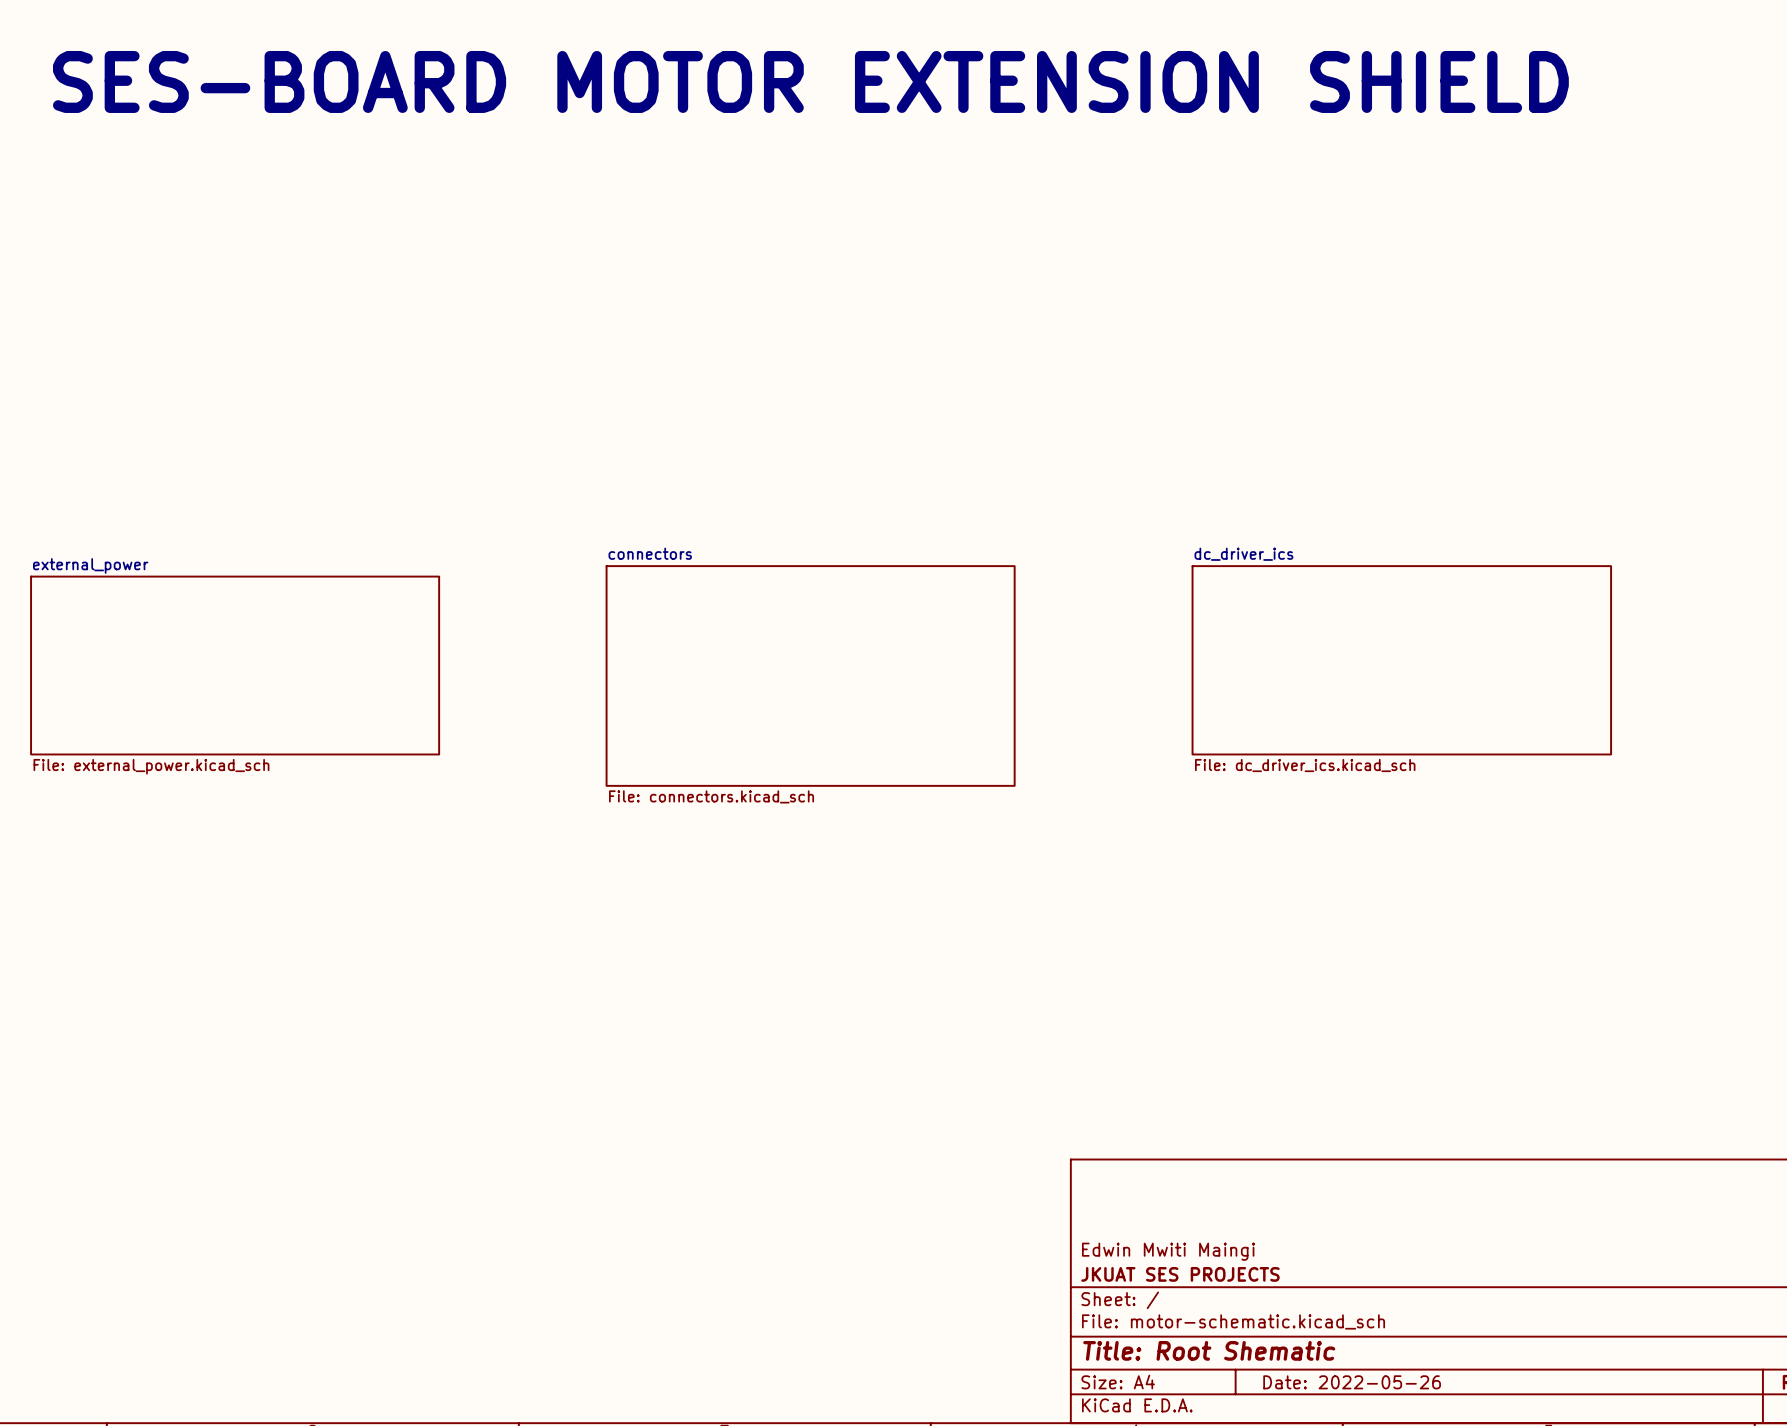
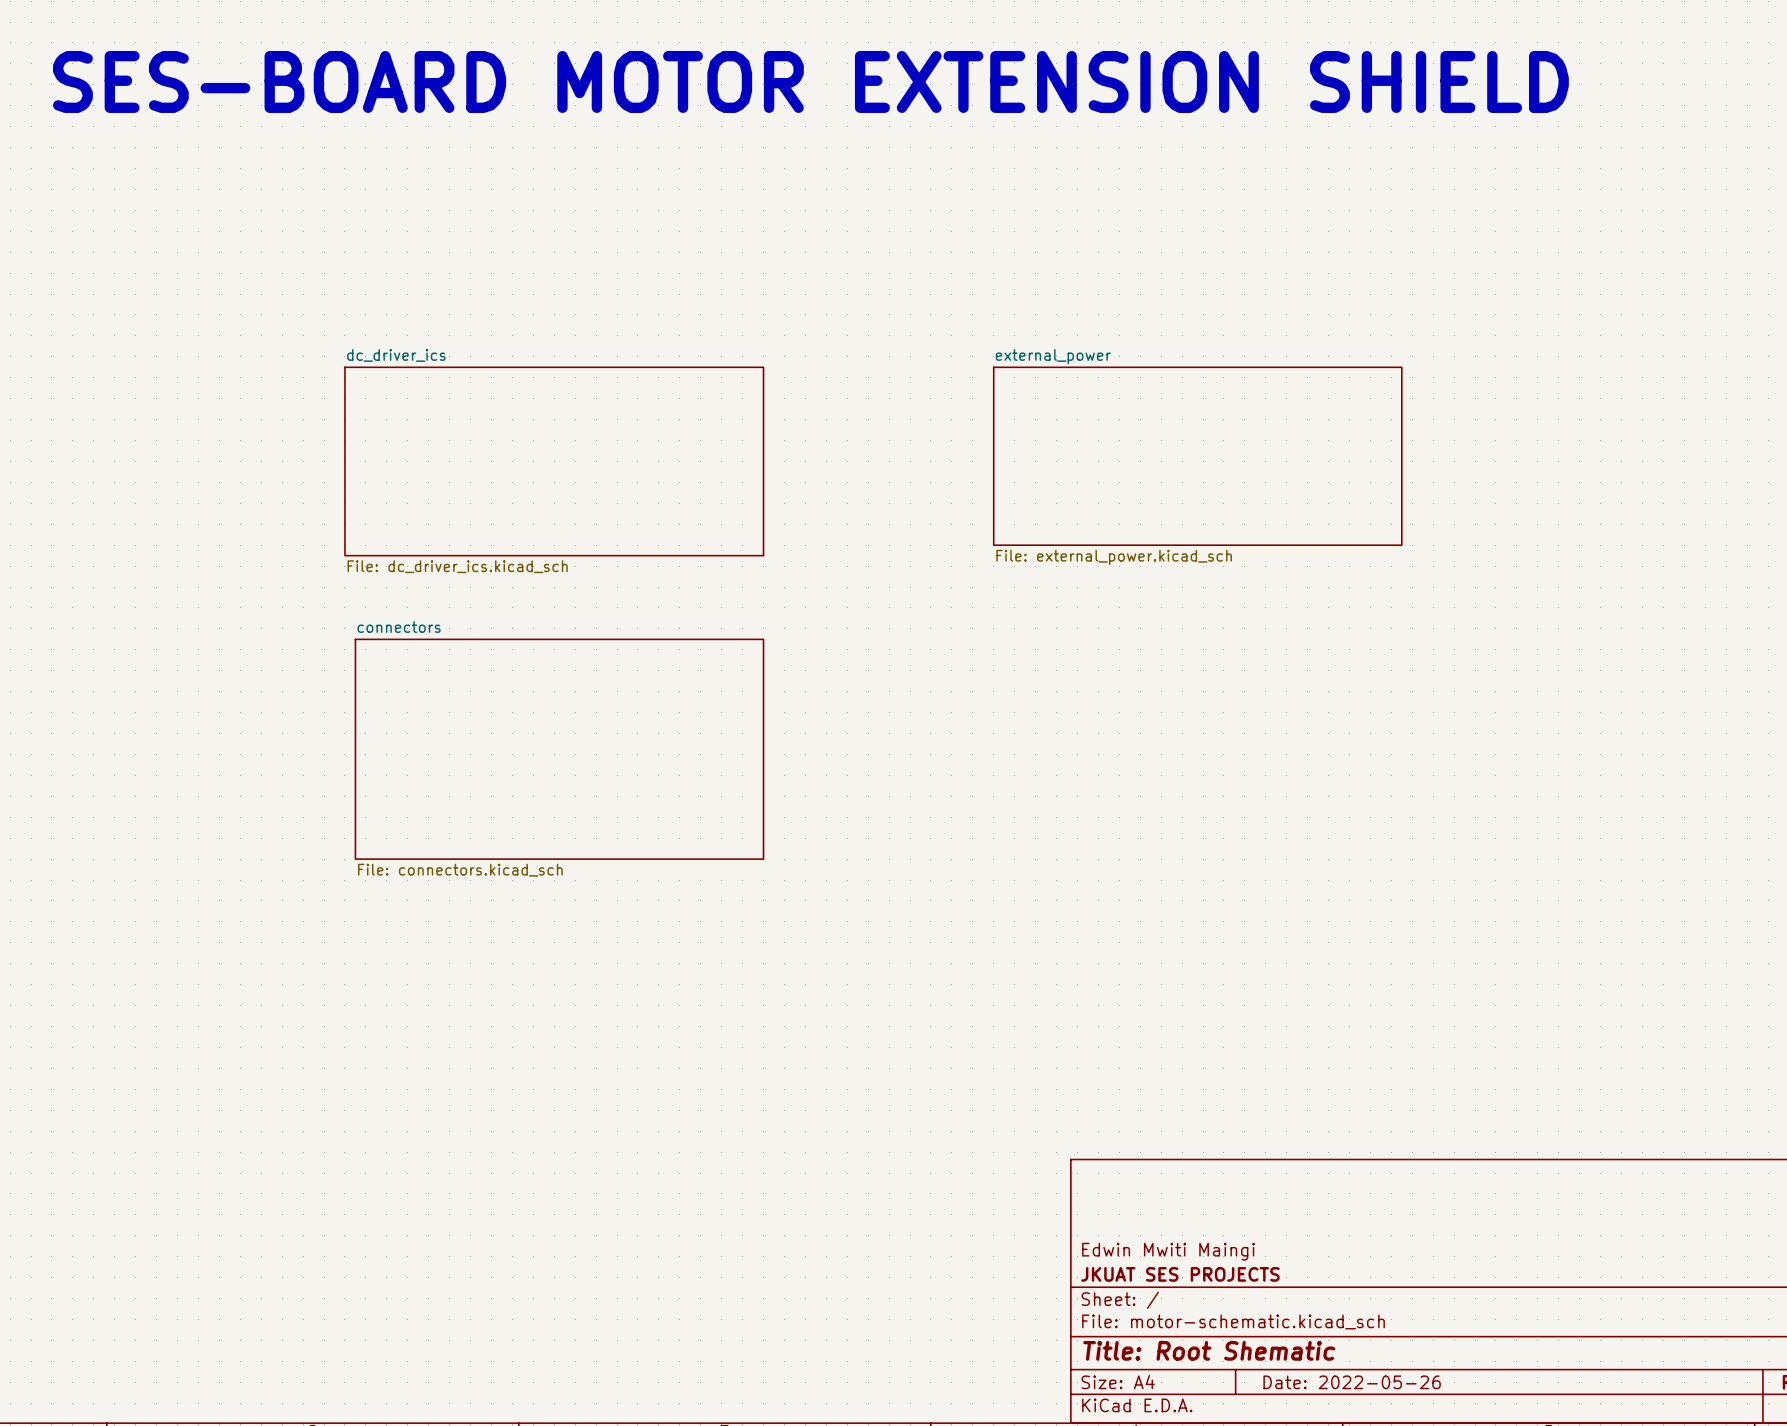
sheet external_power: none -> File: external_power.kicad_sch (1197, 456)
sheet dc_driver_ics: none -> File: dc_driver_ics.kicad_sch (554, 461)
sheet dc_driver_ics: File: dc_driver_ics.kicad_sch (1401, 660) -> none
sheet external_power: File: external_power.kicad_sch (235, 665) -> none
sheet connectors: File: connectors.kicad_sch (810, 675) -> none
sheet connectors: none -> File: connectors.kicad_sch (559, 749)

